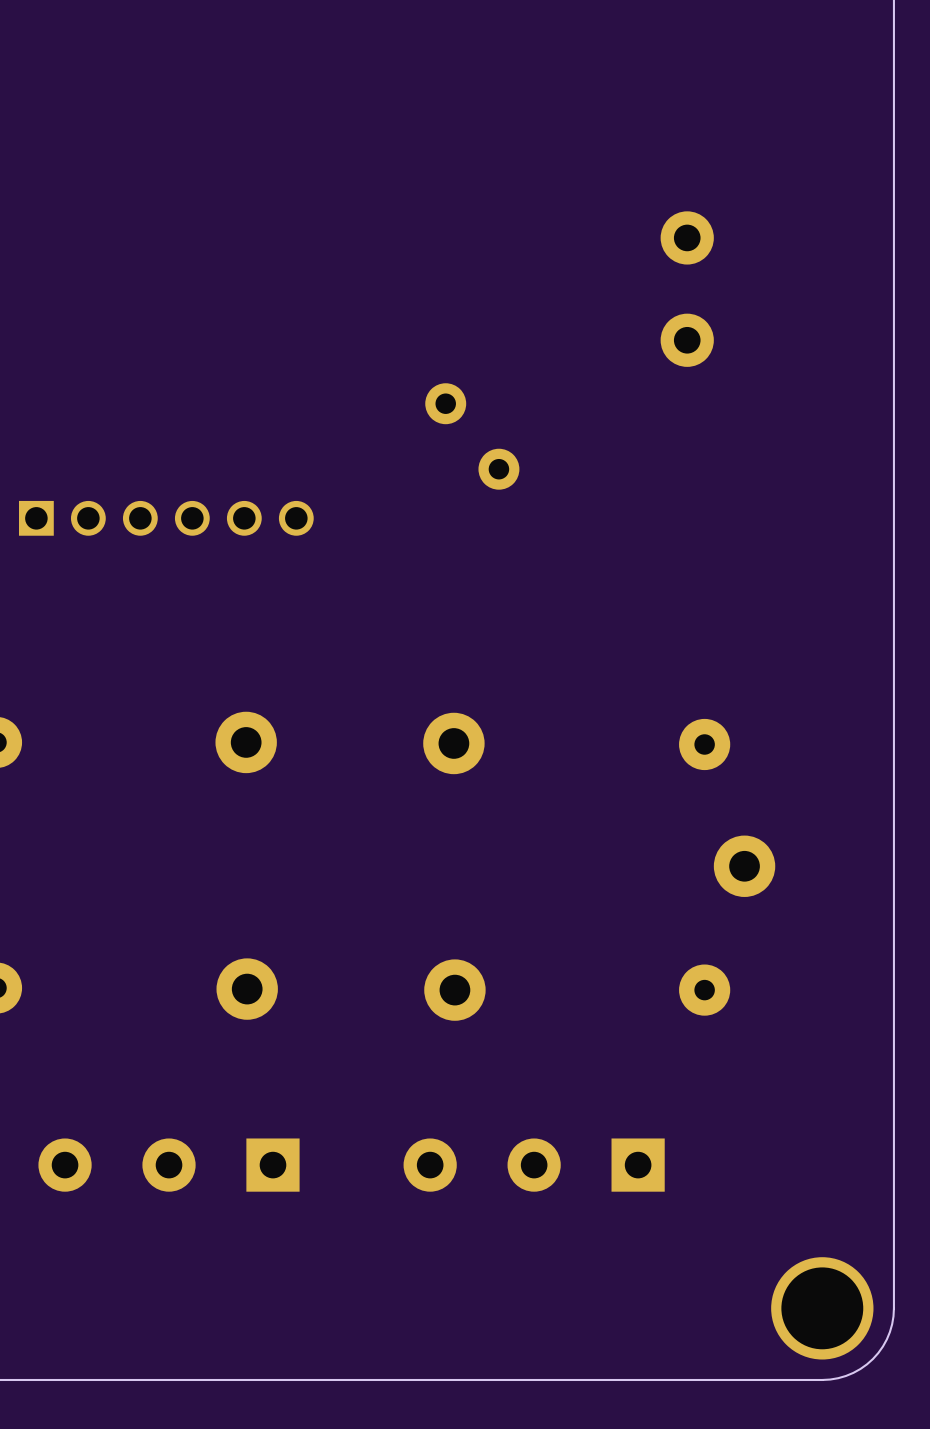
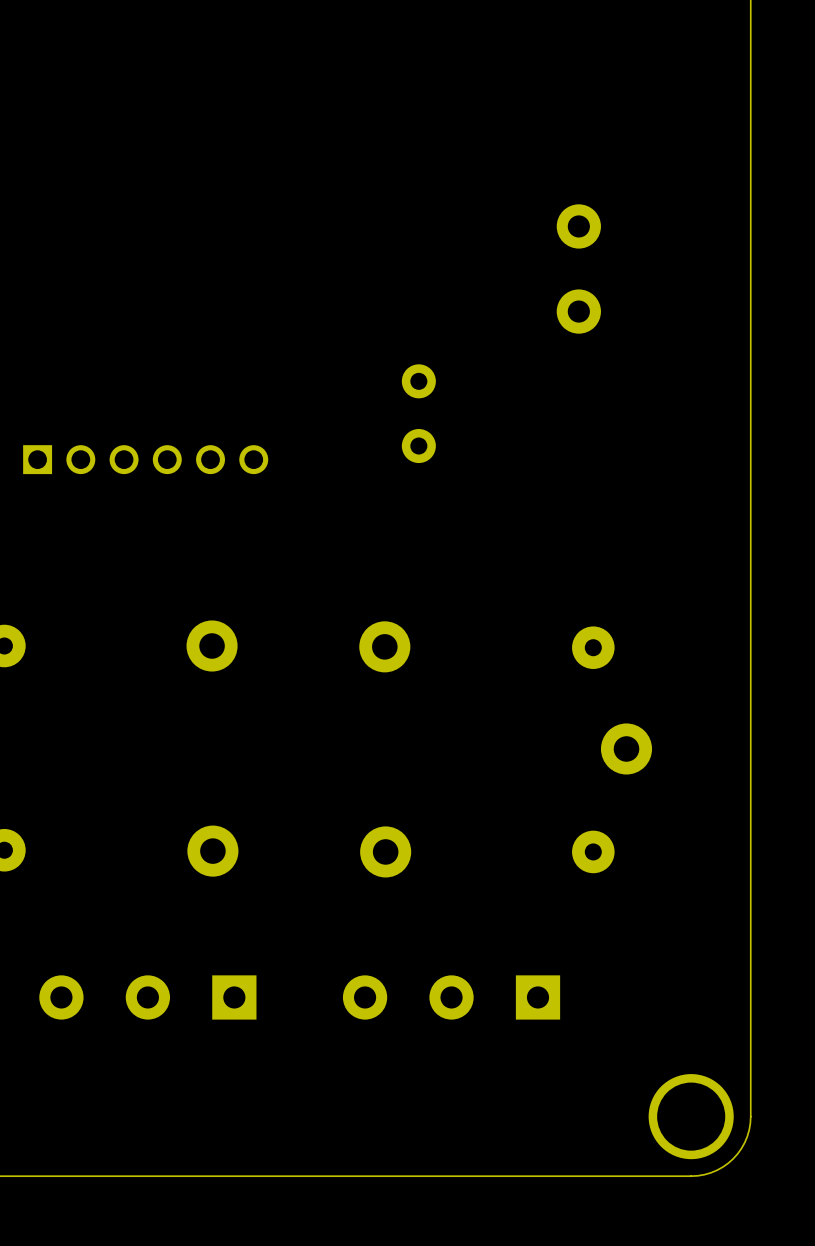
part: (445, 403) -> none
part: none -> (418, 381)
part: (498, 469) -> none
part: none -> (418, 446)

